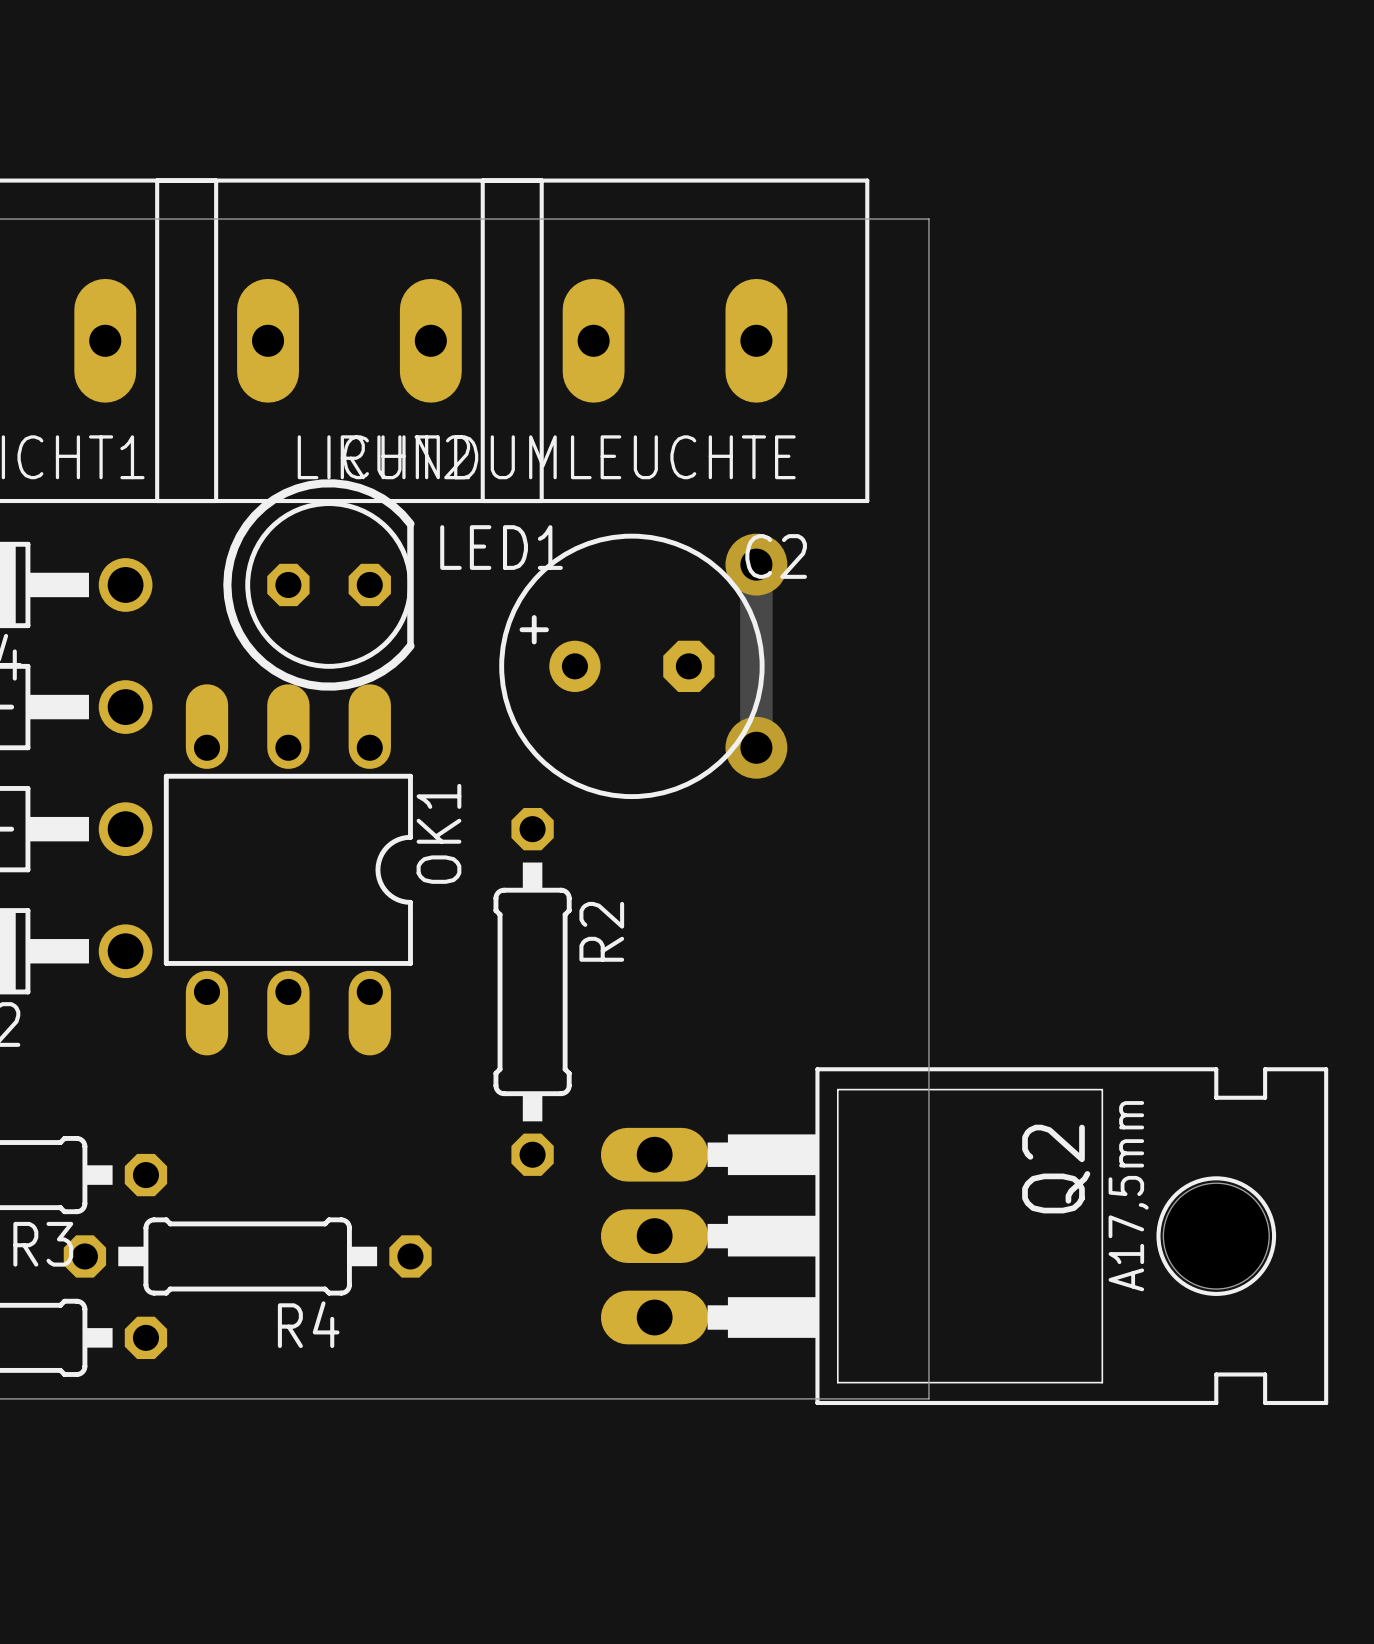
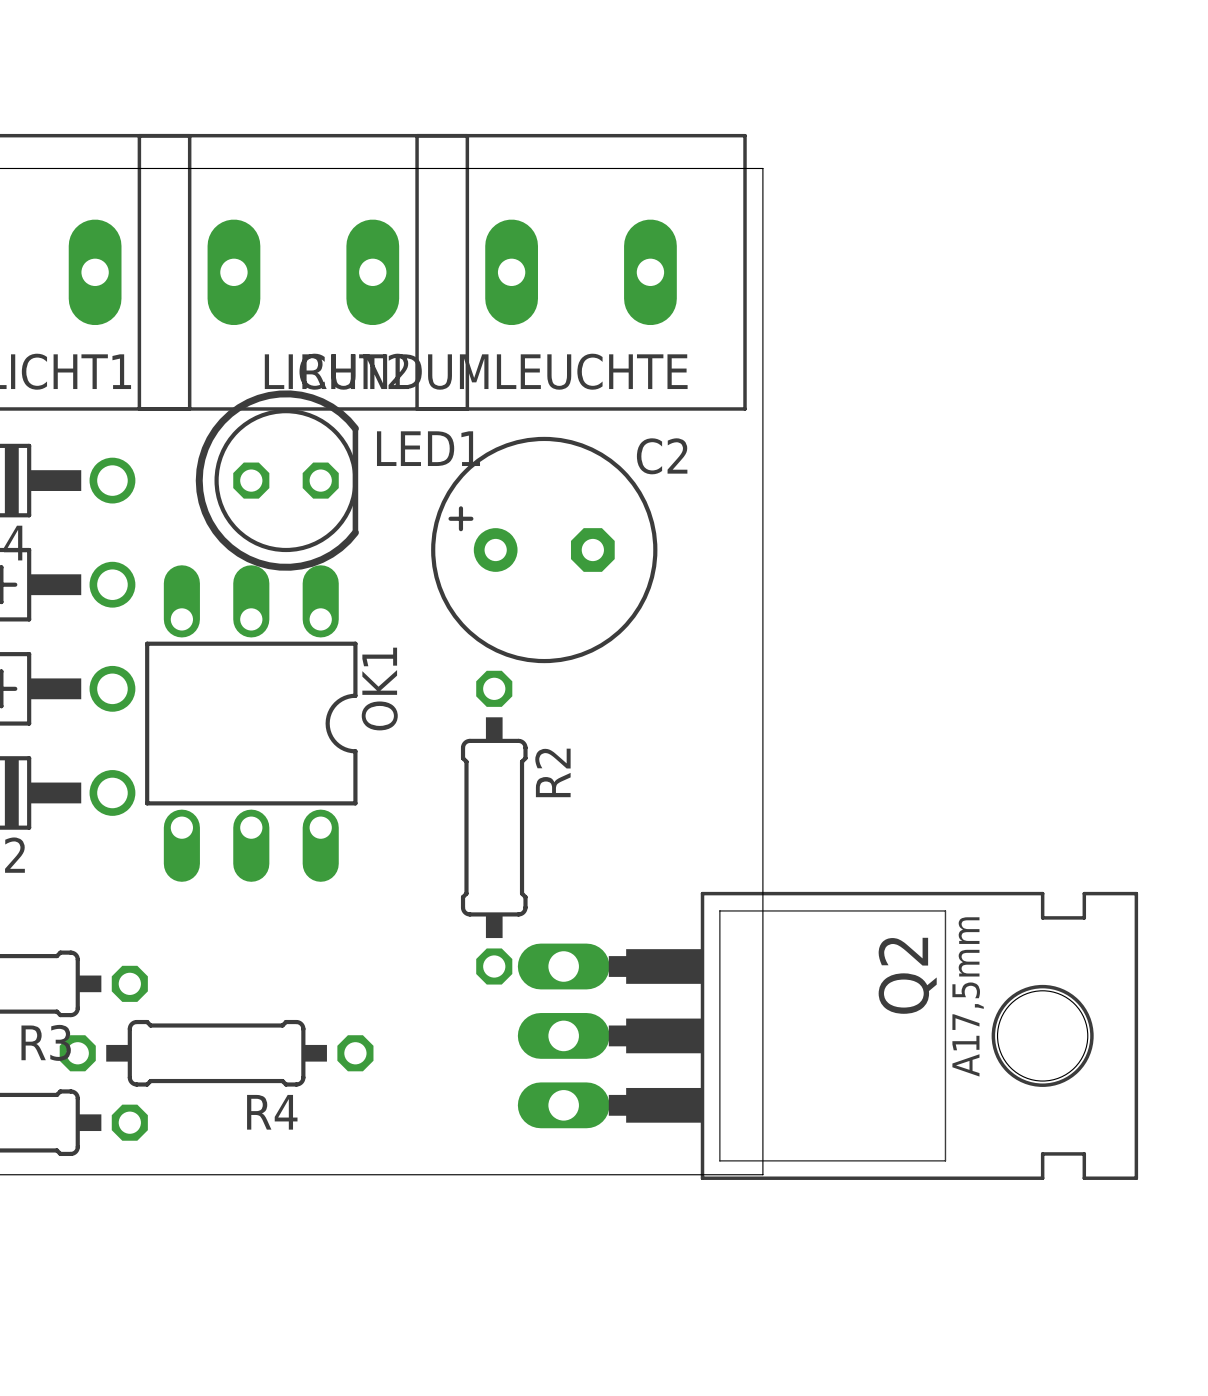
board edge: (888, 219) (928, 219) (928, 1398) (888, 1398) -> (762, 168) (762, 1174)
track: (756, 564) (756, 747) -> none
via: (756, 564) -> none
via: (756, 747) -> none
R2 position: (532, 991) -> (494, 827)

